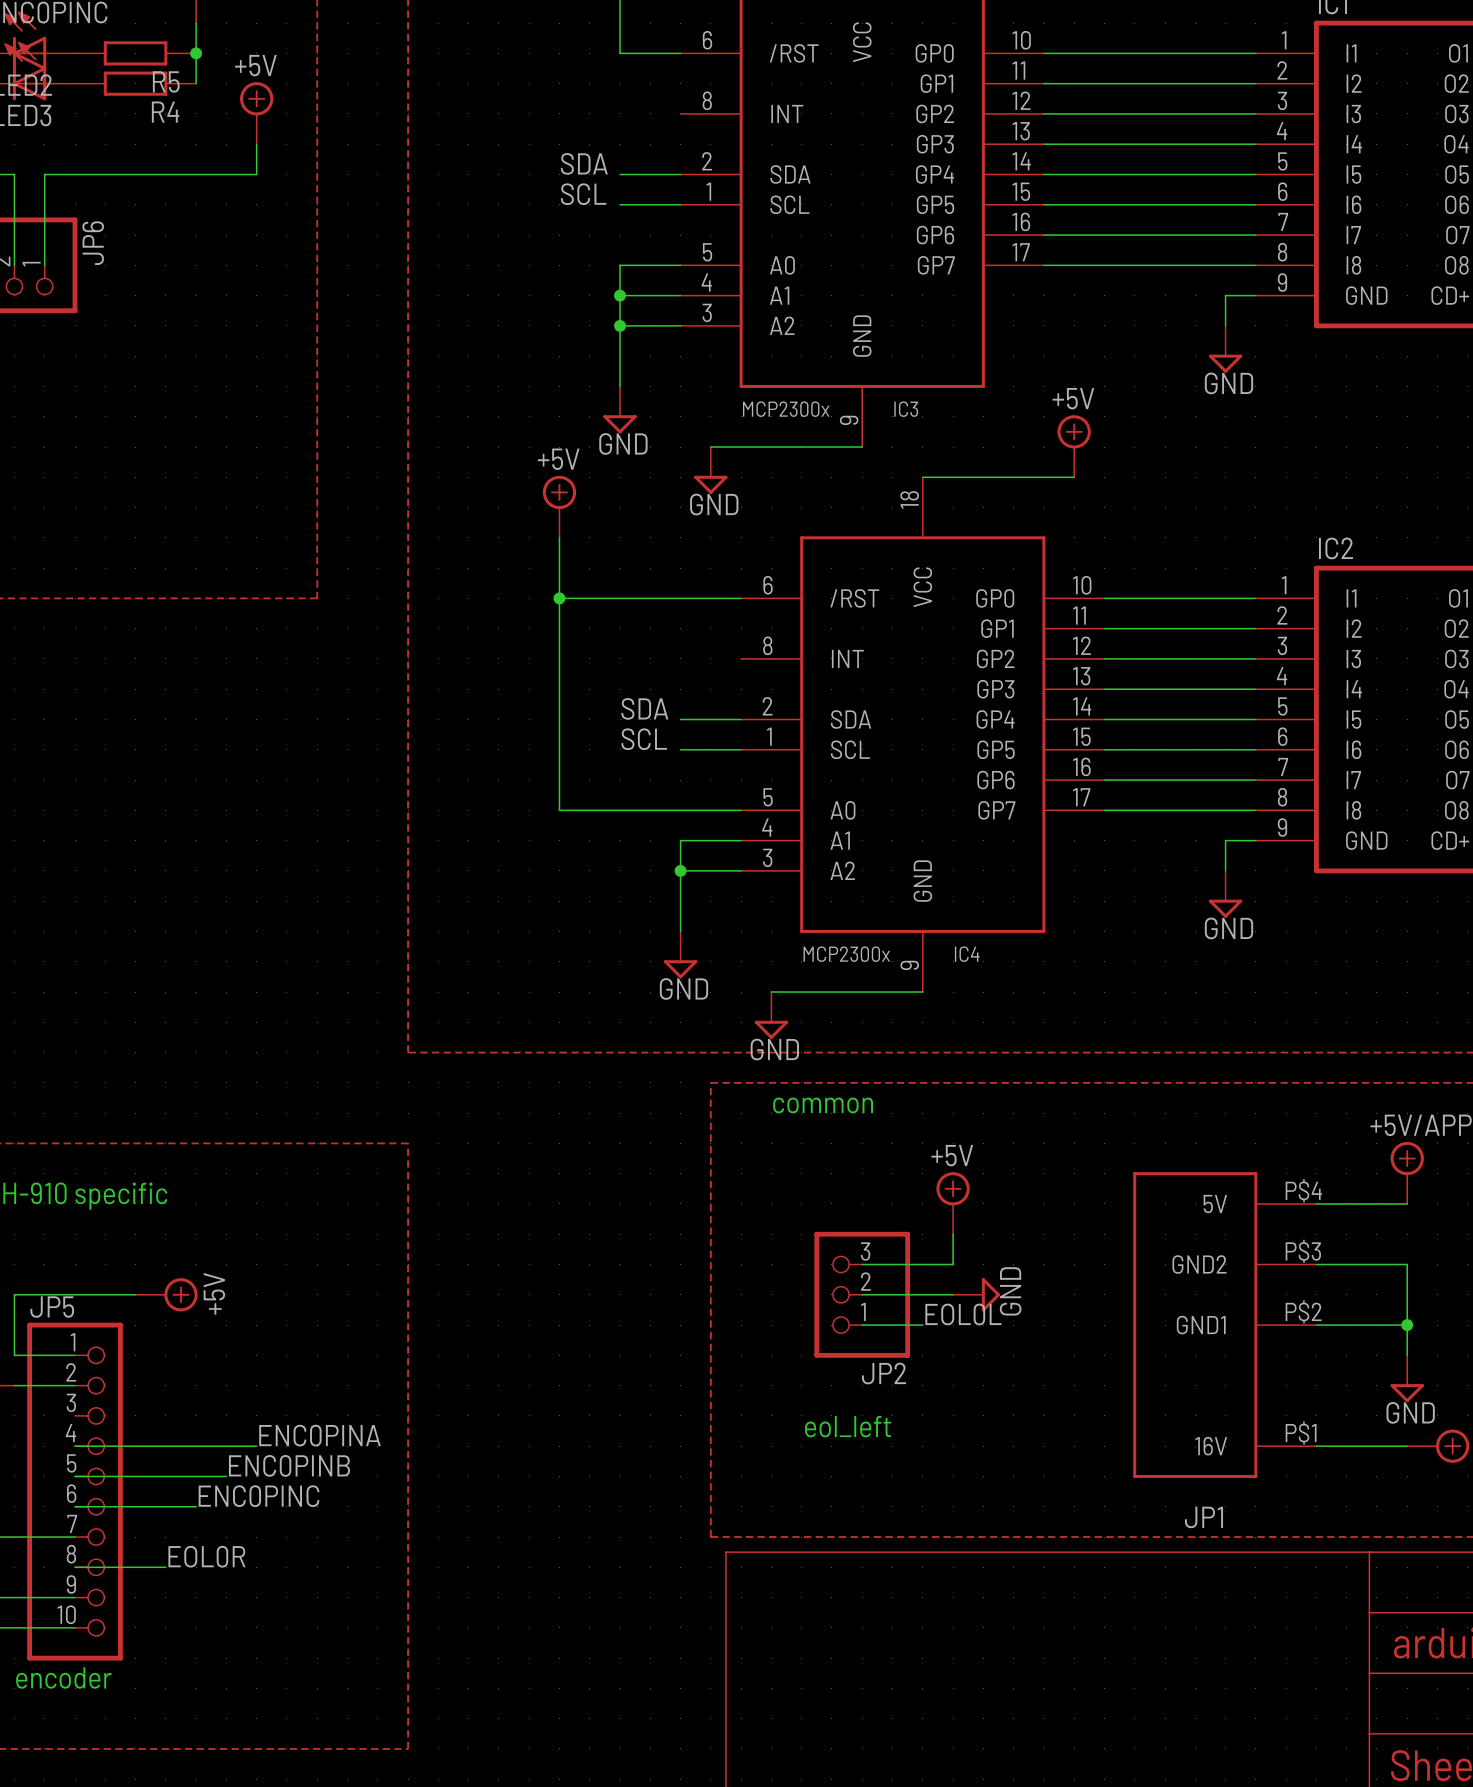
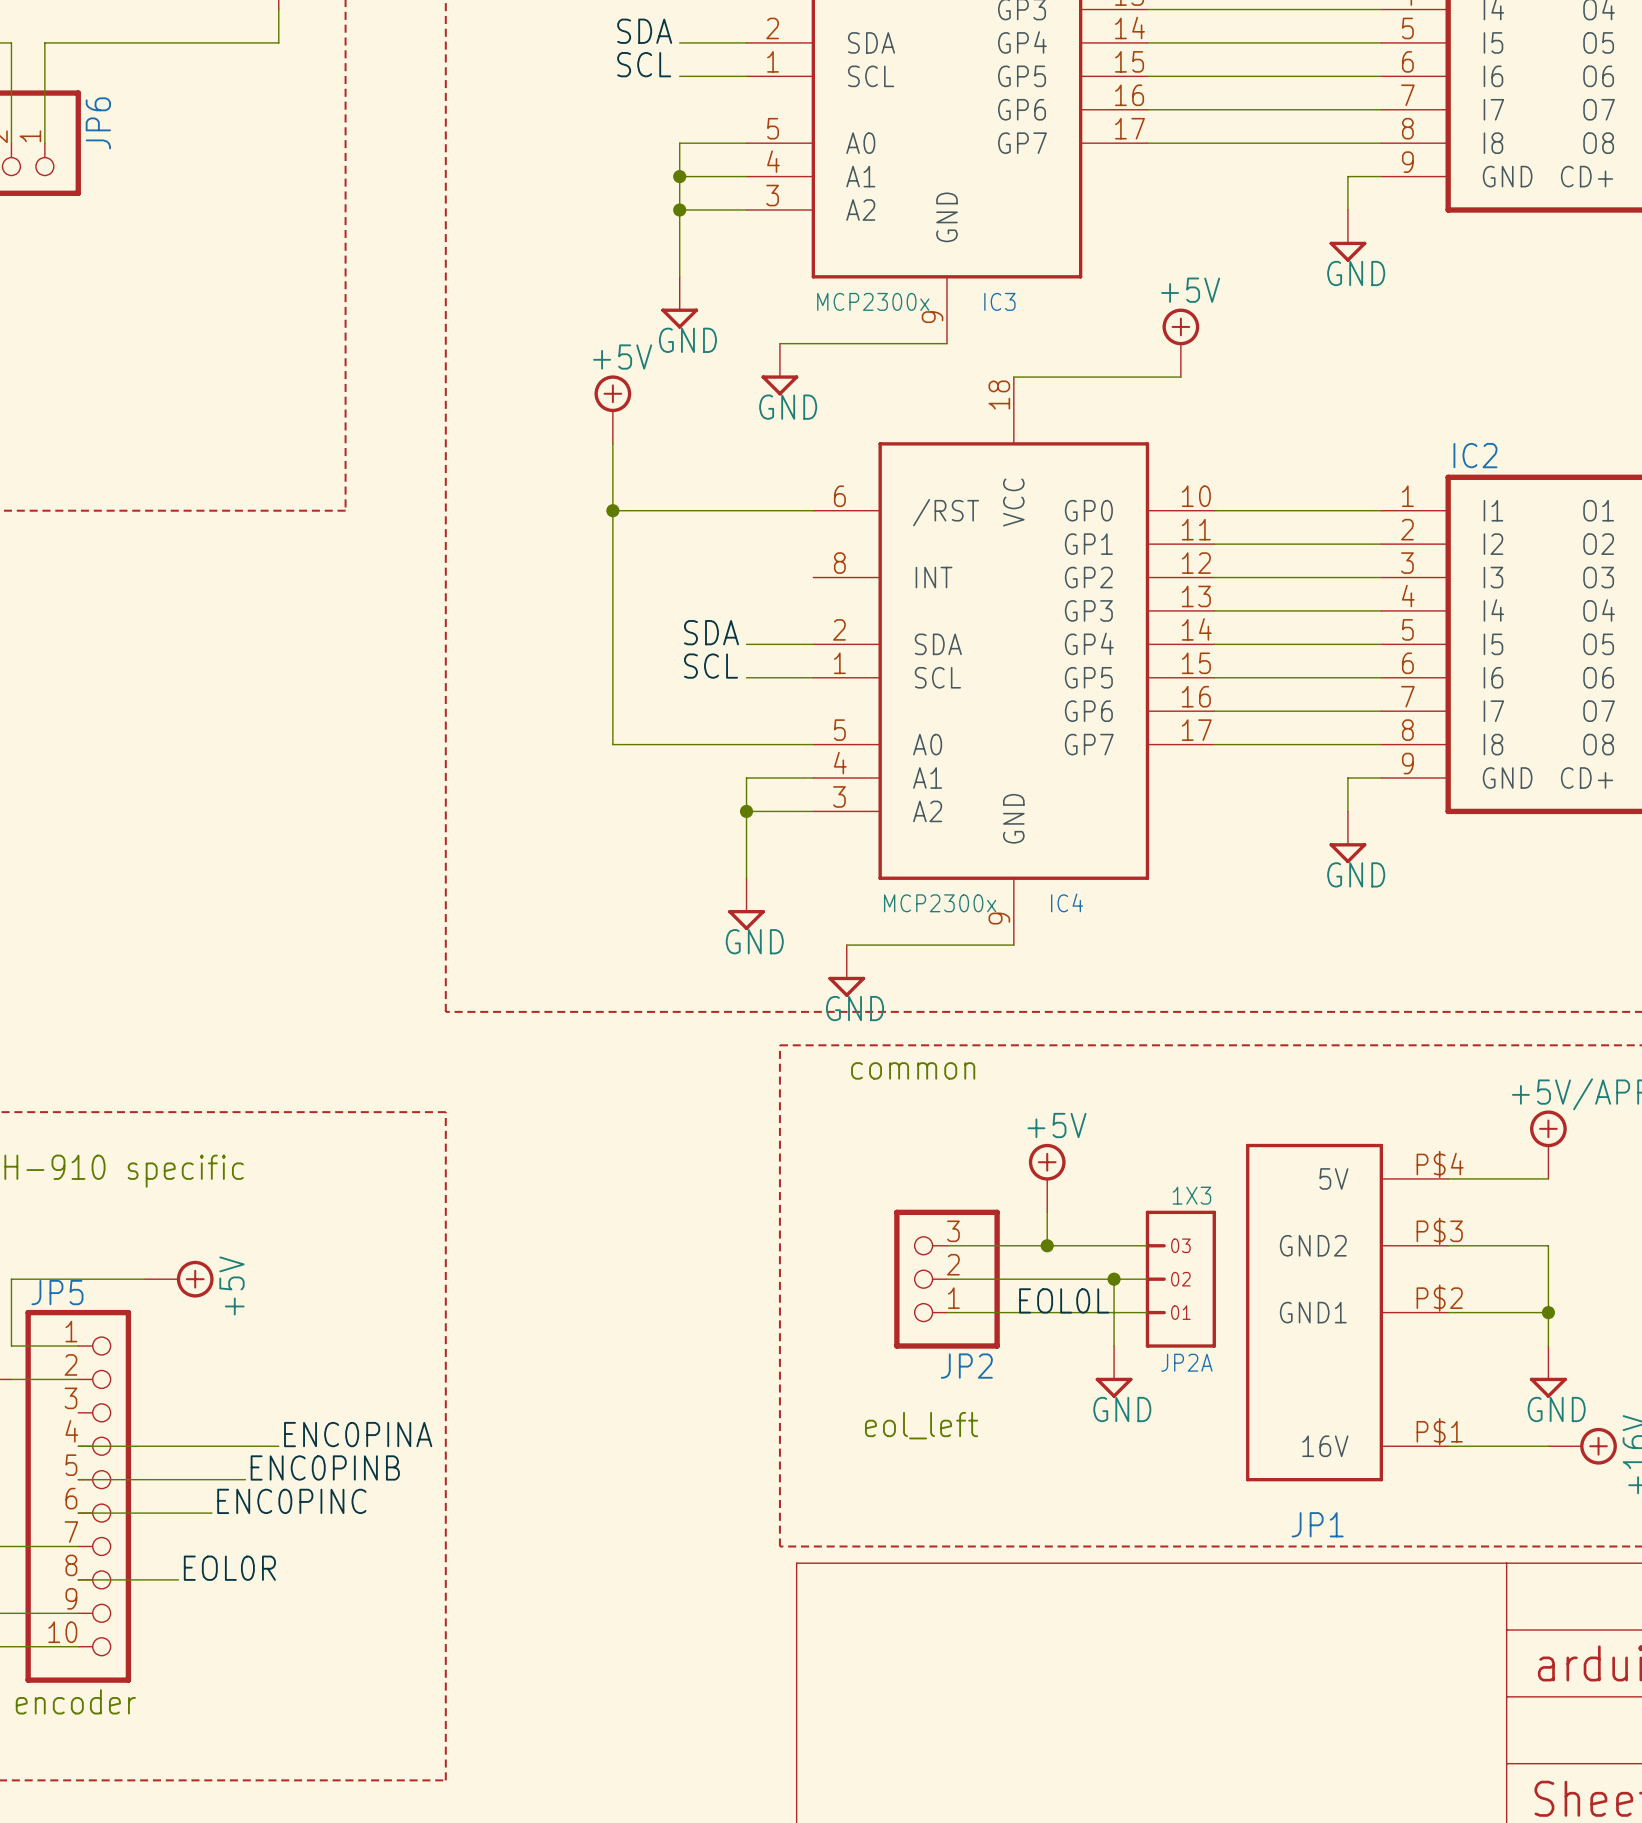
wire: none -> (1047, 1245) (1147, 1245)
junction: none -> (1047, 1245)
wire: none -> (1047, 1279) (1147, 1279)
power symbol position: GND (976, 1294) -> GND (1114, 1371)
power symbol rotation: 0° (990, 1294) -> 90° clockwise (1114, 1387)
wire: none -> (1114, 1279) (1114, 1346)
junction: none -> (1114, 1279)
JP2A: none -> 1X3 (1180, 1279)
wire: none -> (1013, 1312) (1147, 1312)

